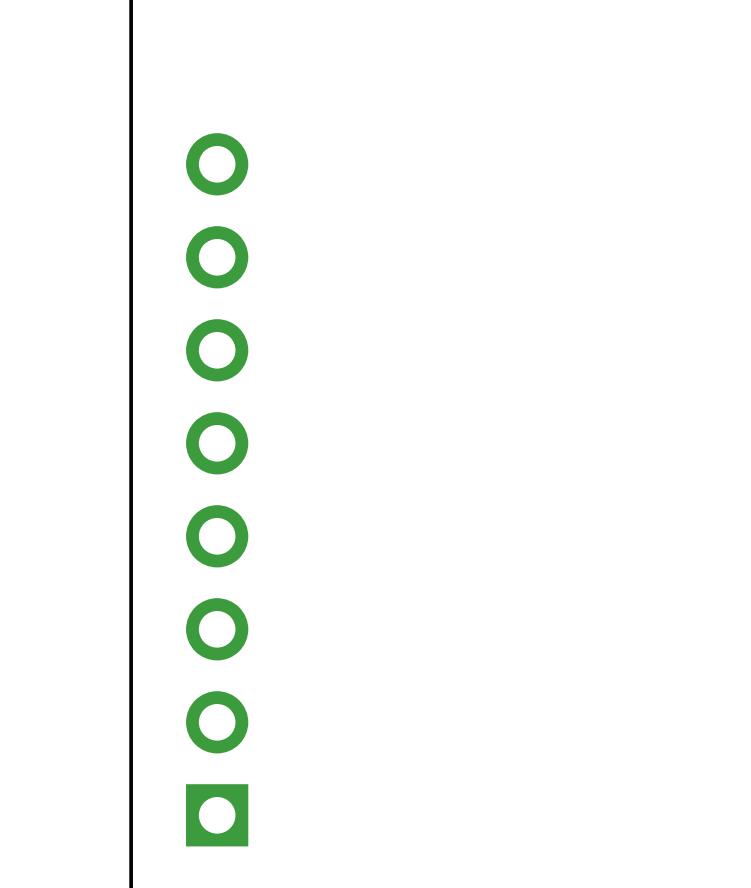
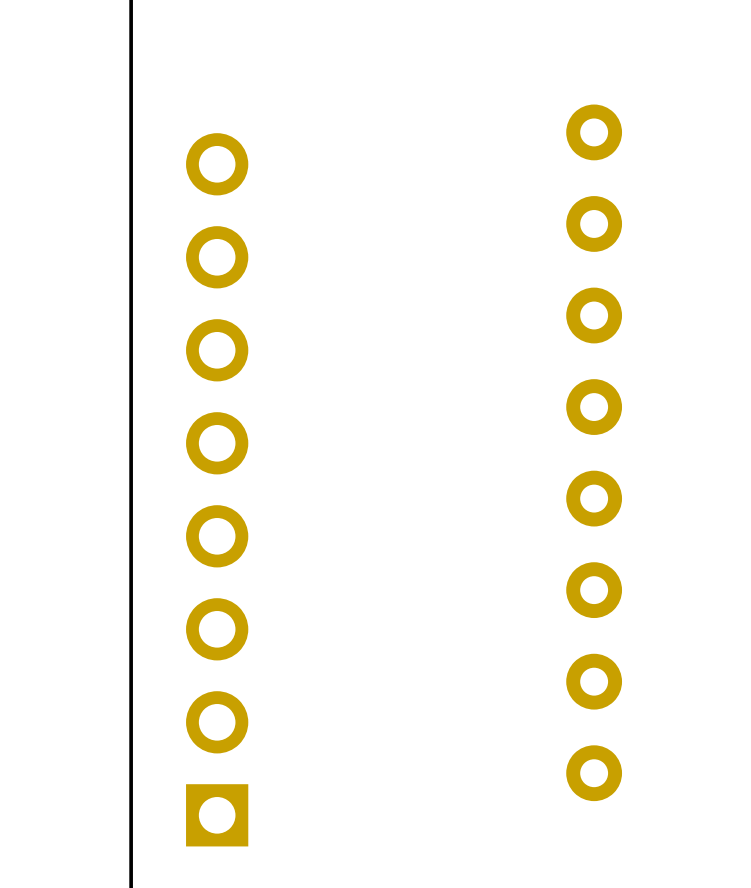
part: none -> (594, 452)

